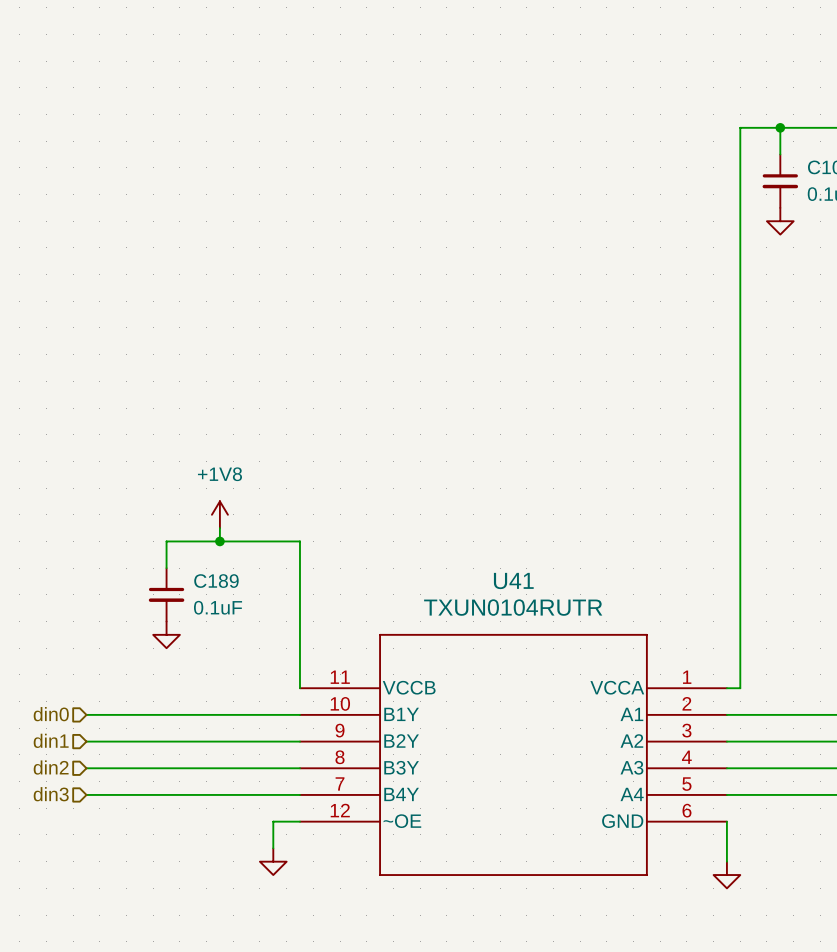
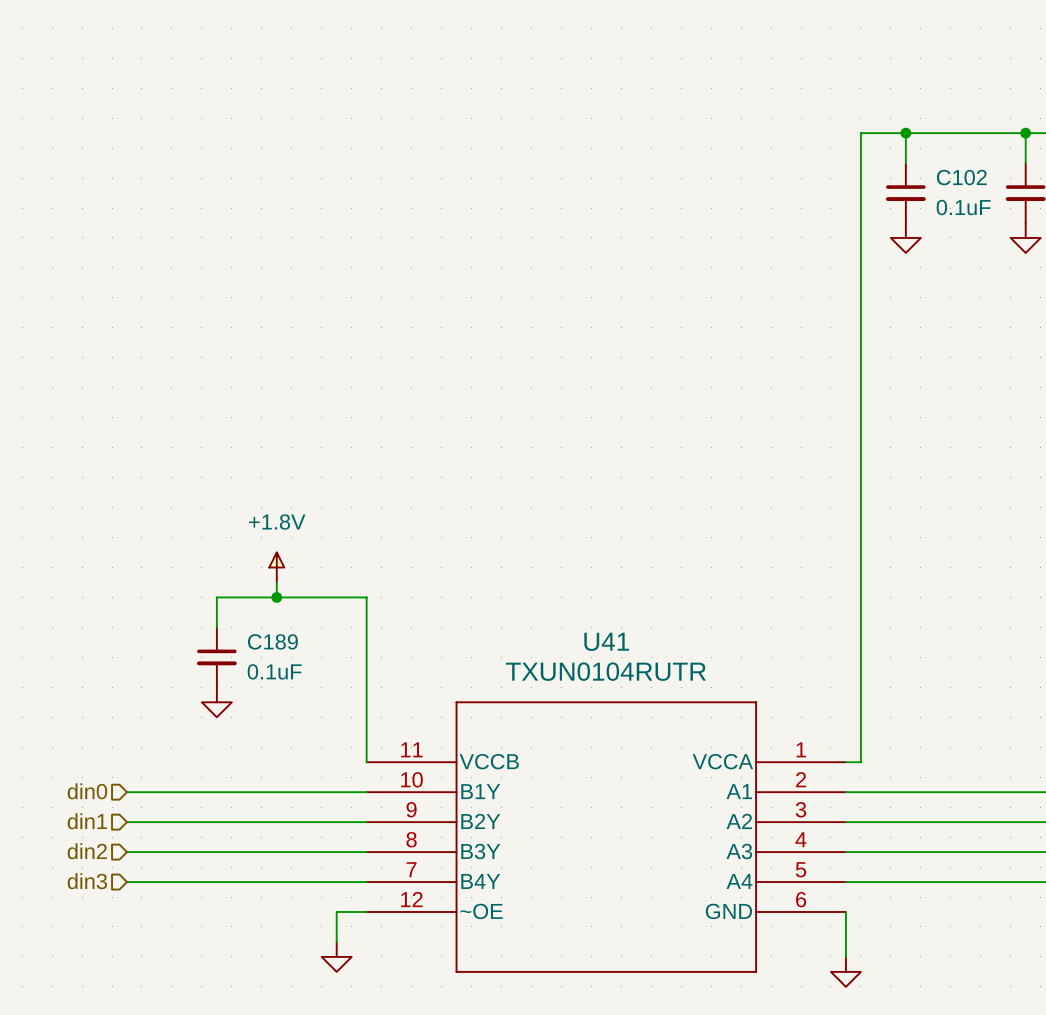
power symbol: +1V8 (219, 514) -> +1.8V (276, 567)

